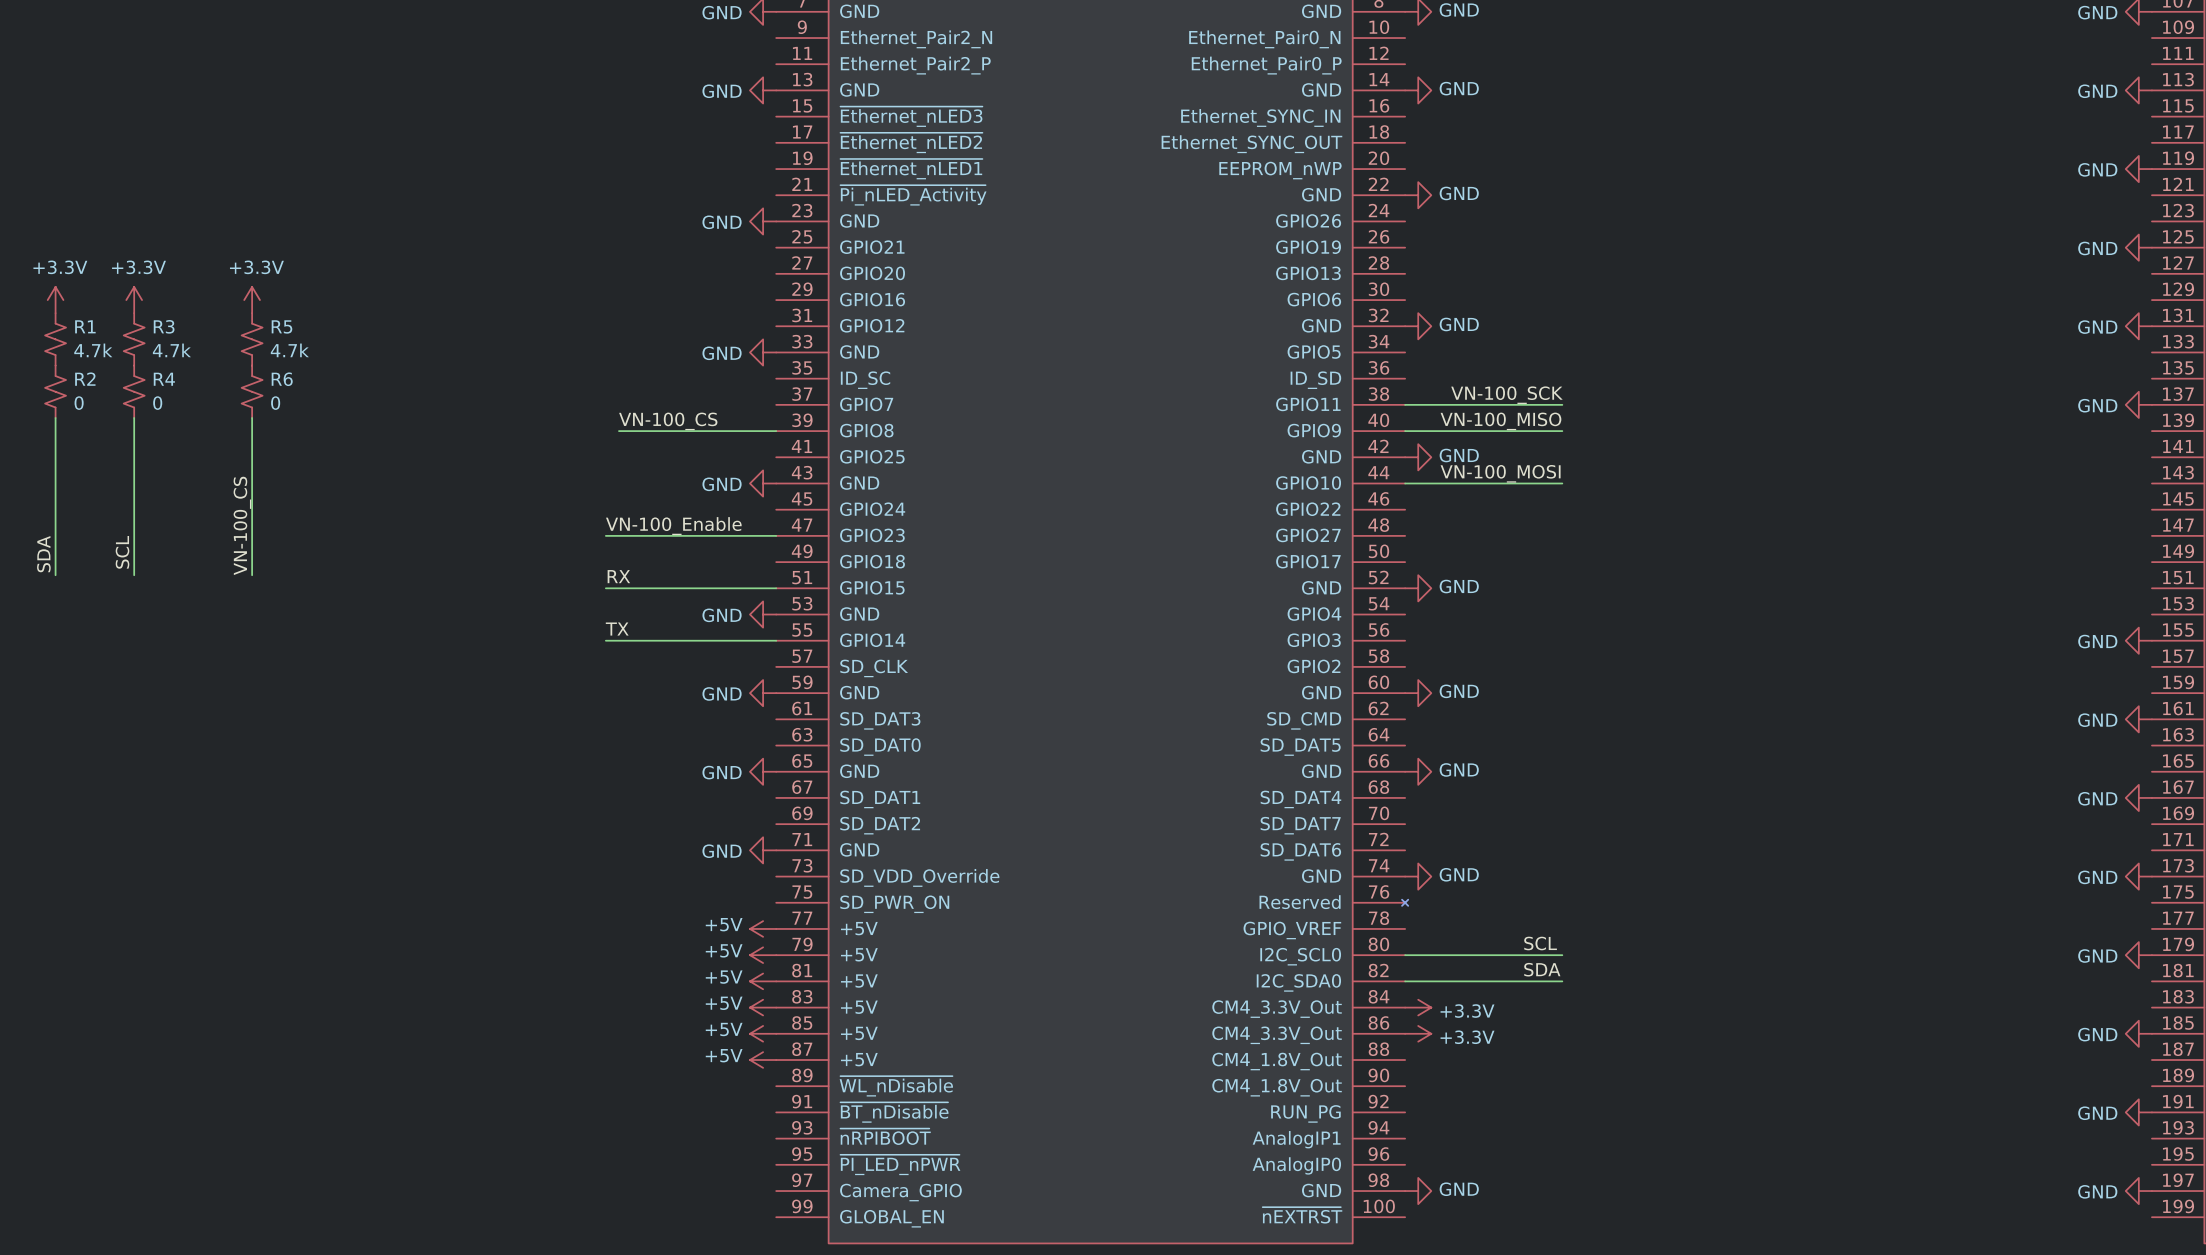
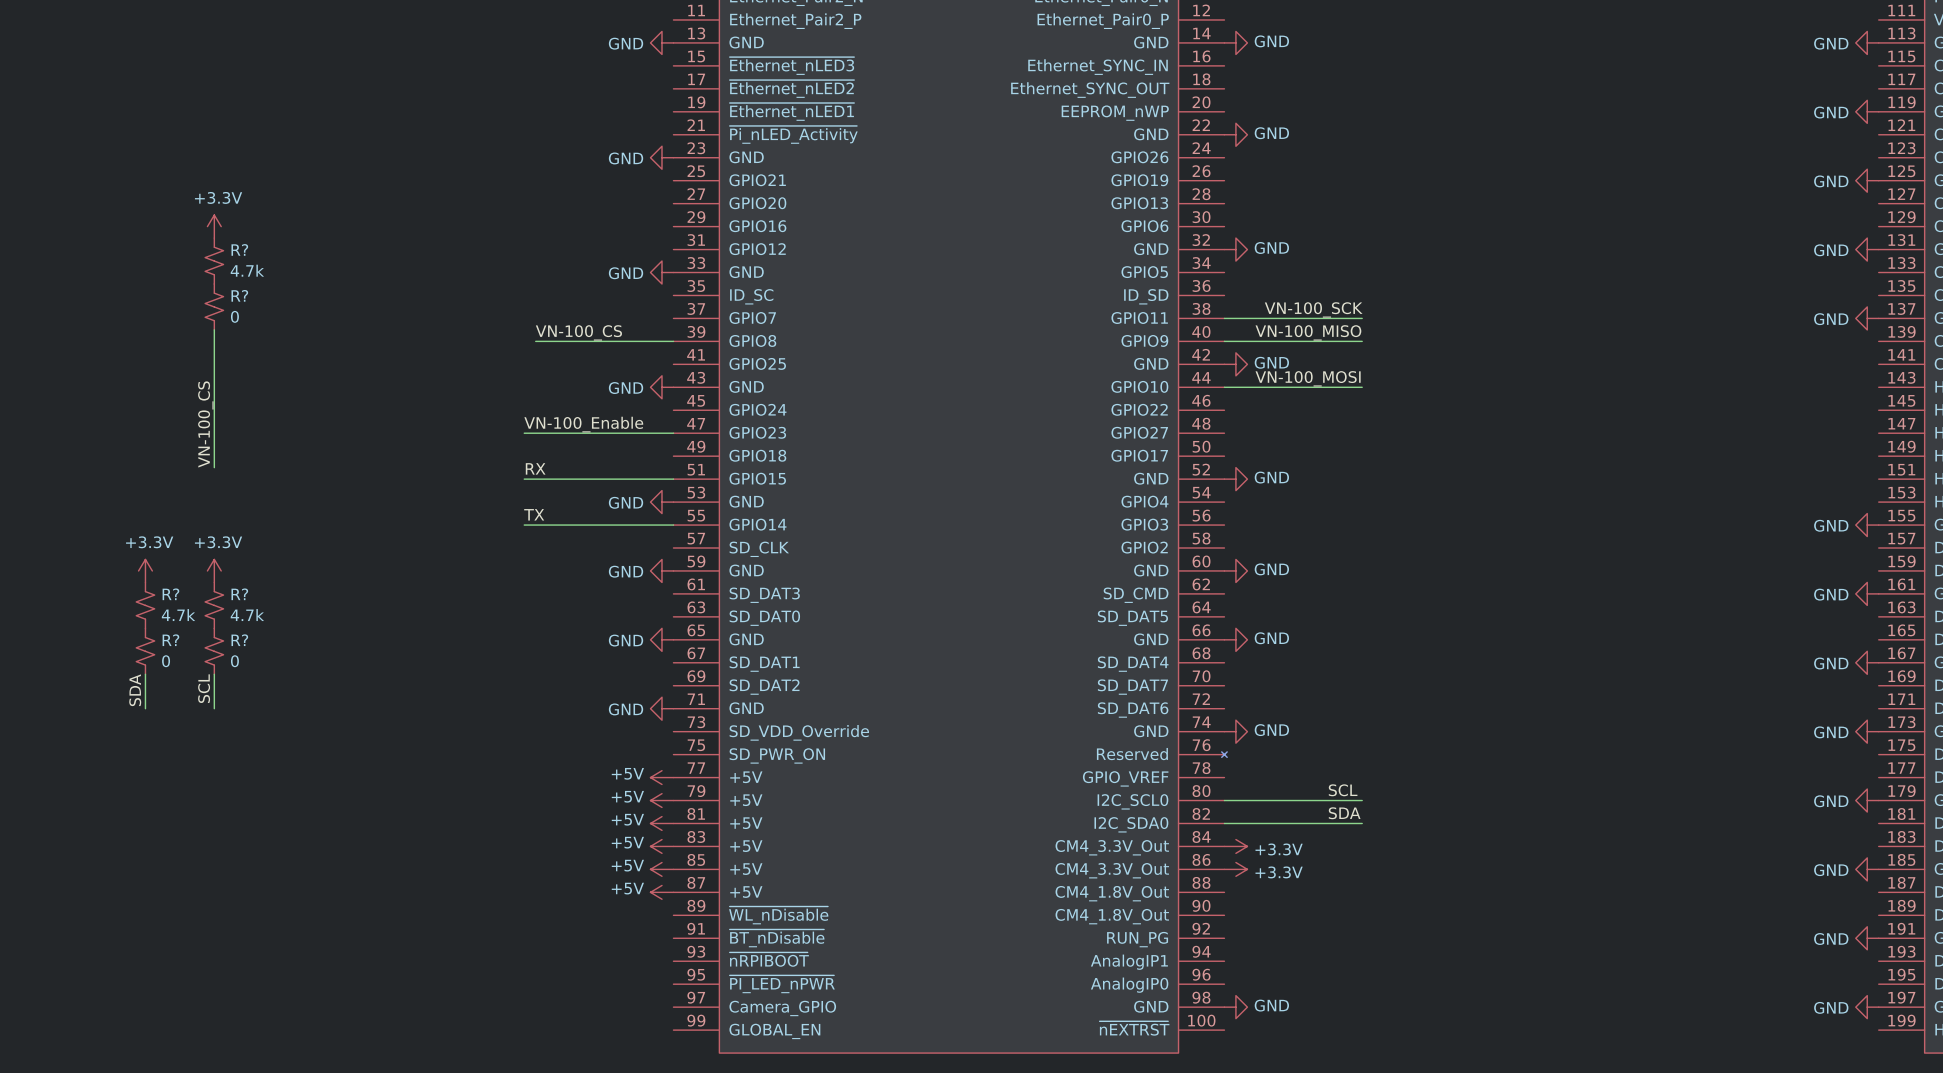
power symbol: +3.3V (55, 300) -> none
power symbol: +3.3V (134, 300) -> none
R5 name: R5 (281, 326) -> R? (239, 249)
R1: 4.7k (55, 339) -> none
R3: 4.7k (134, 339) -> none
R6 name: R6 (282, 379) -> R? (239, 295)
R2: 0 (55, 391) -> none
R4: 0 (134, 391) -> none
wire: (55, 417) (55, 575) -> none
wire: (134, 417) (134, 575) -> none
label: SCL (122, 552) -> none
label: SDA (43, 554) -> none
power symbol: none -> +3.3V (145, 570)
power symbol: none -> +3.3V (214, 570)
R?: none -> 4.7k (145, 605)
R?: none -> 4.7k (214, 605)
R?: none -> 0 (145, 651)
R?: none -> 0 (214, 651)
wire: none -> (145, 674) (145, 708)
wire: none -> (214, 674) (214, 708)
label: none -> SCL (204, 688)
label: none -> SDA (135, 690)

